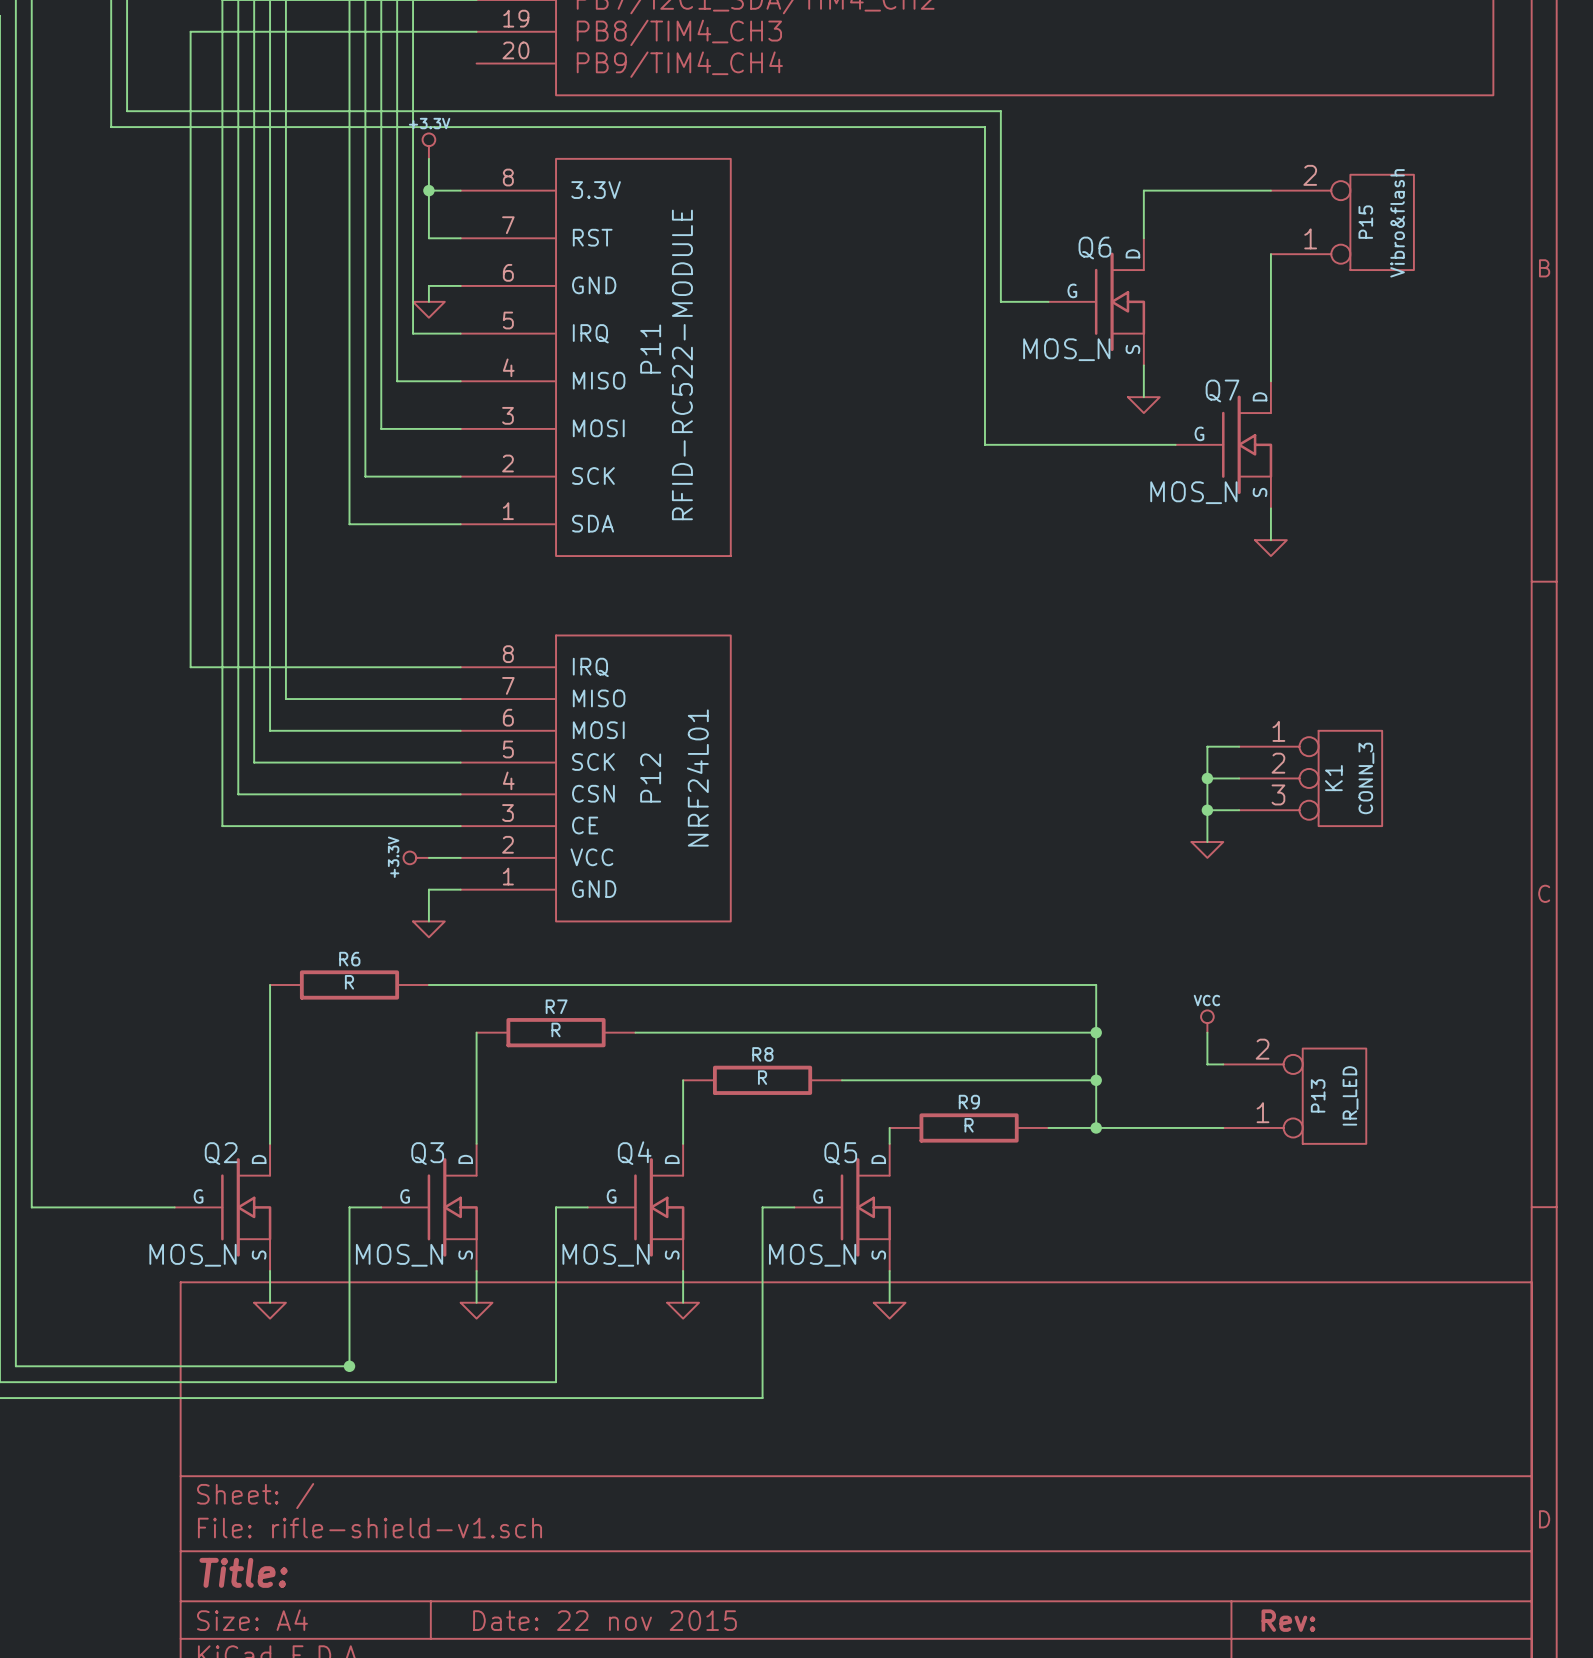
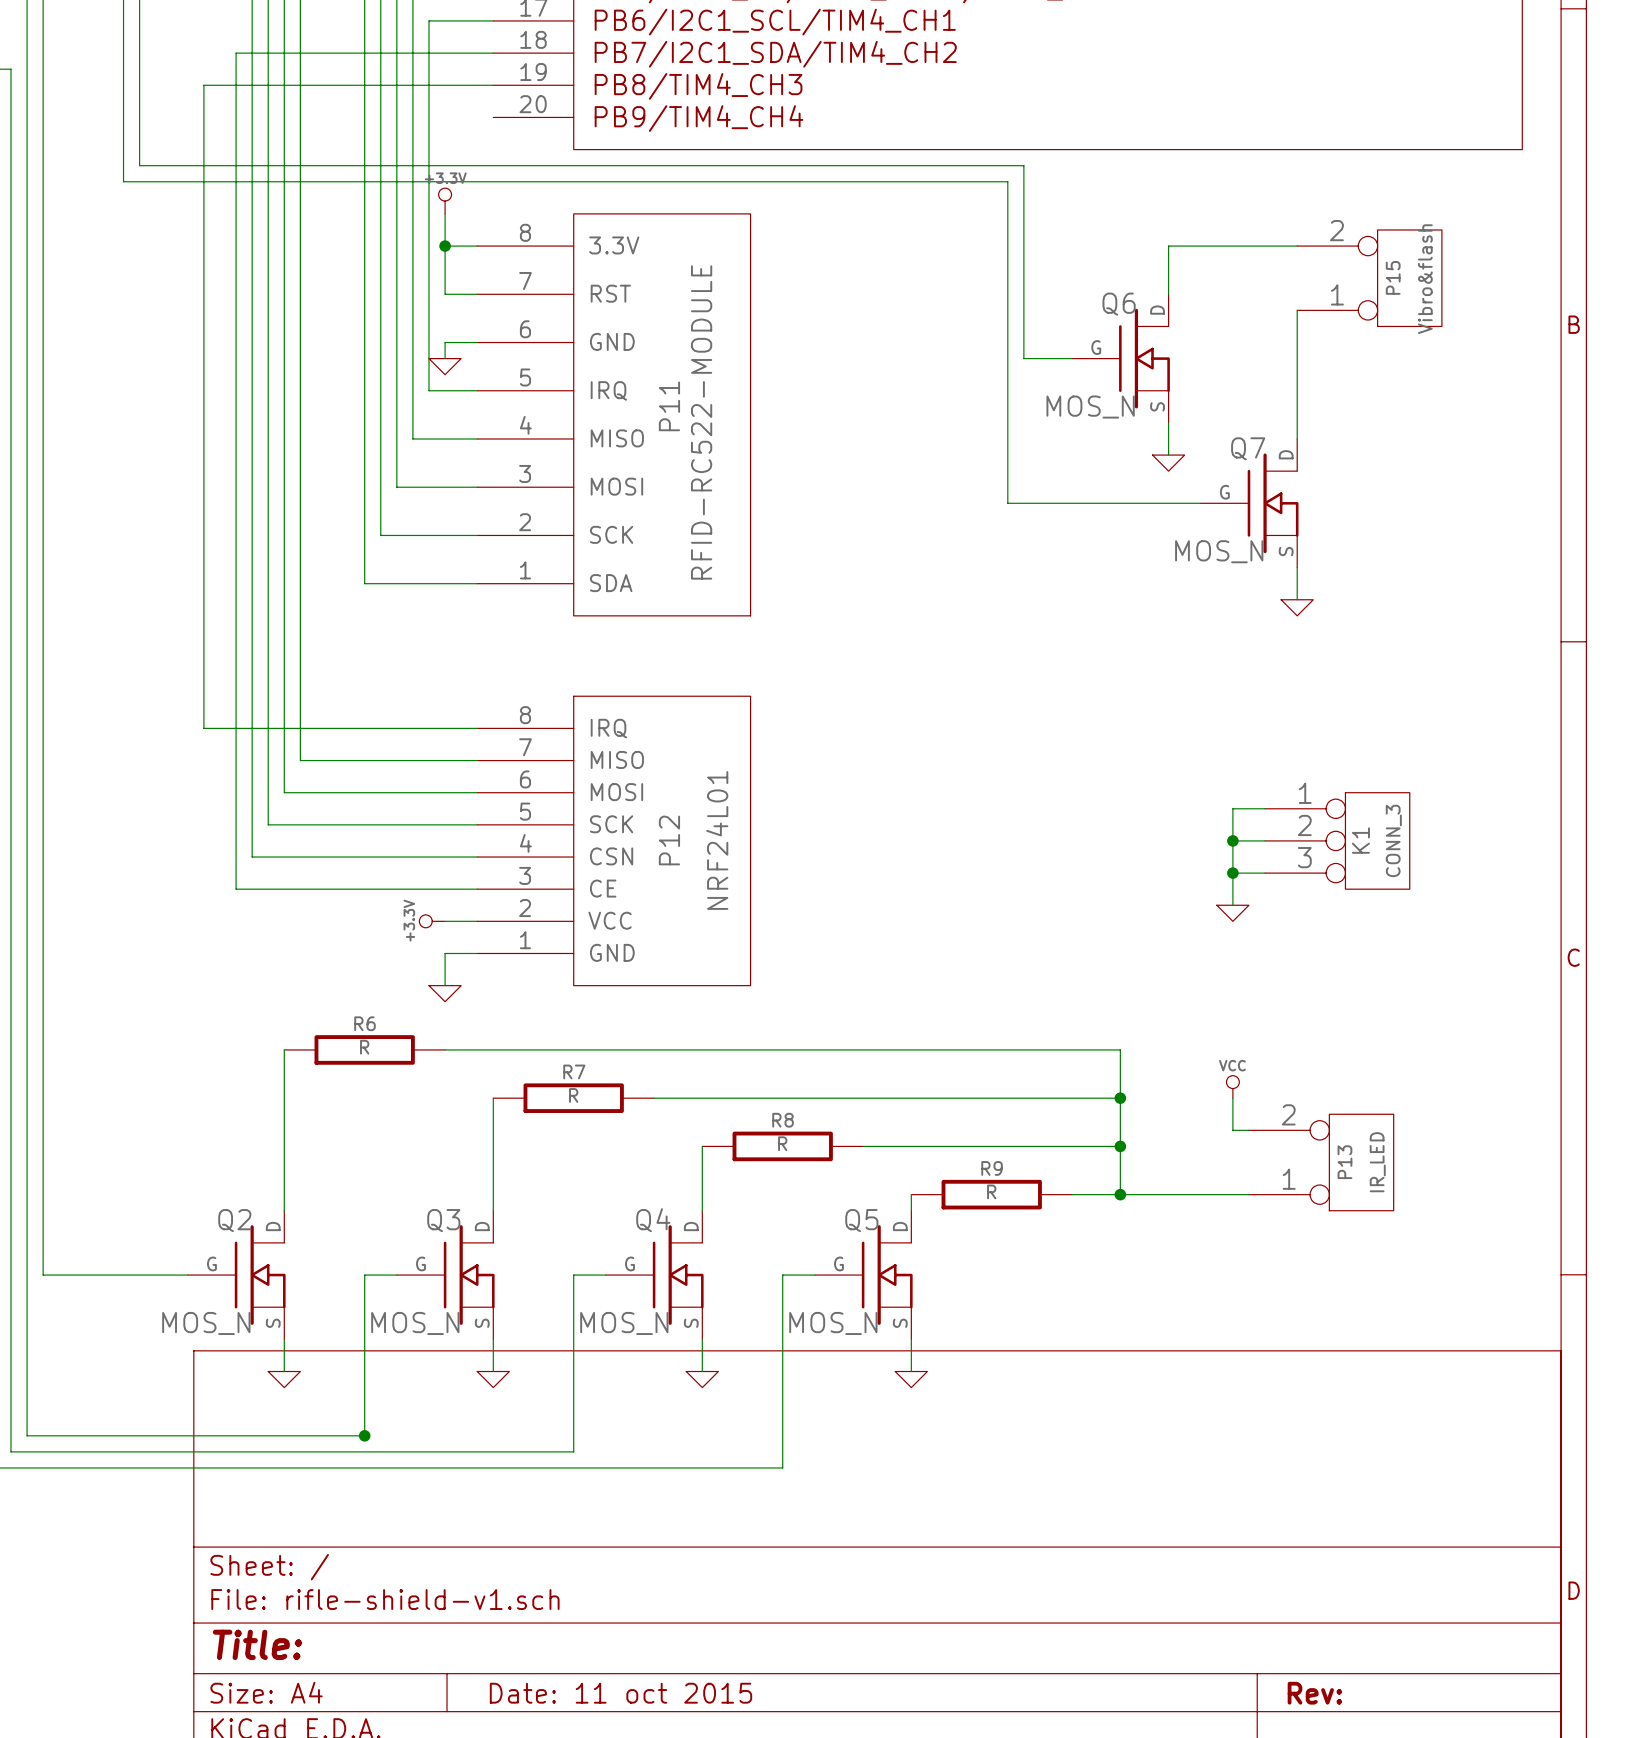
title block: Date: 22 nov 2015 (604, 1620) -> Date: 11 oct 2015 (620, 1693)

